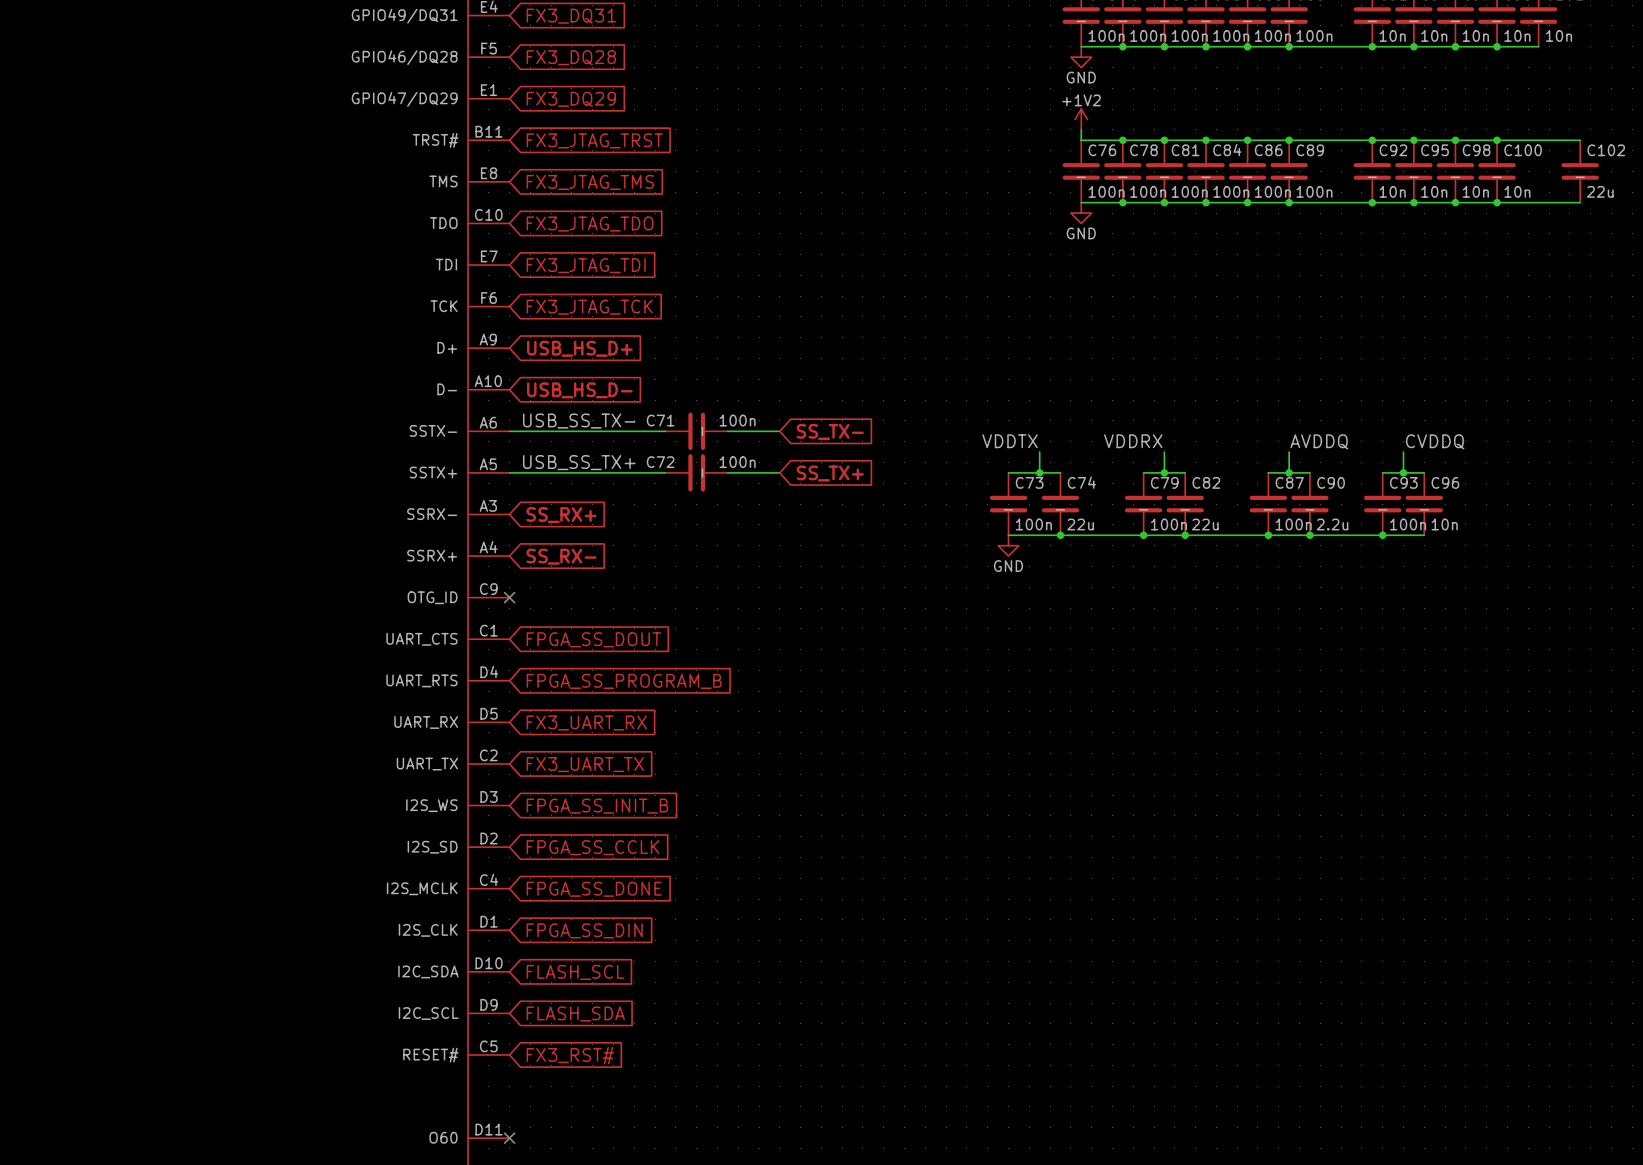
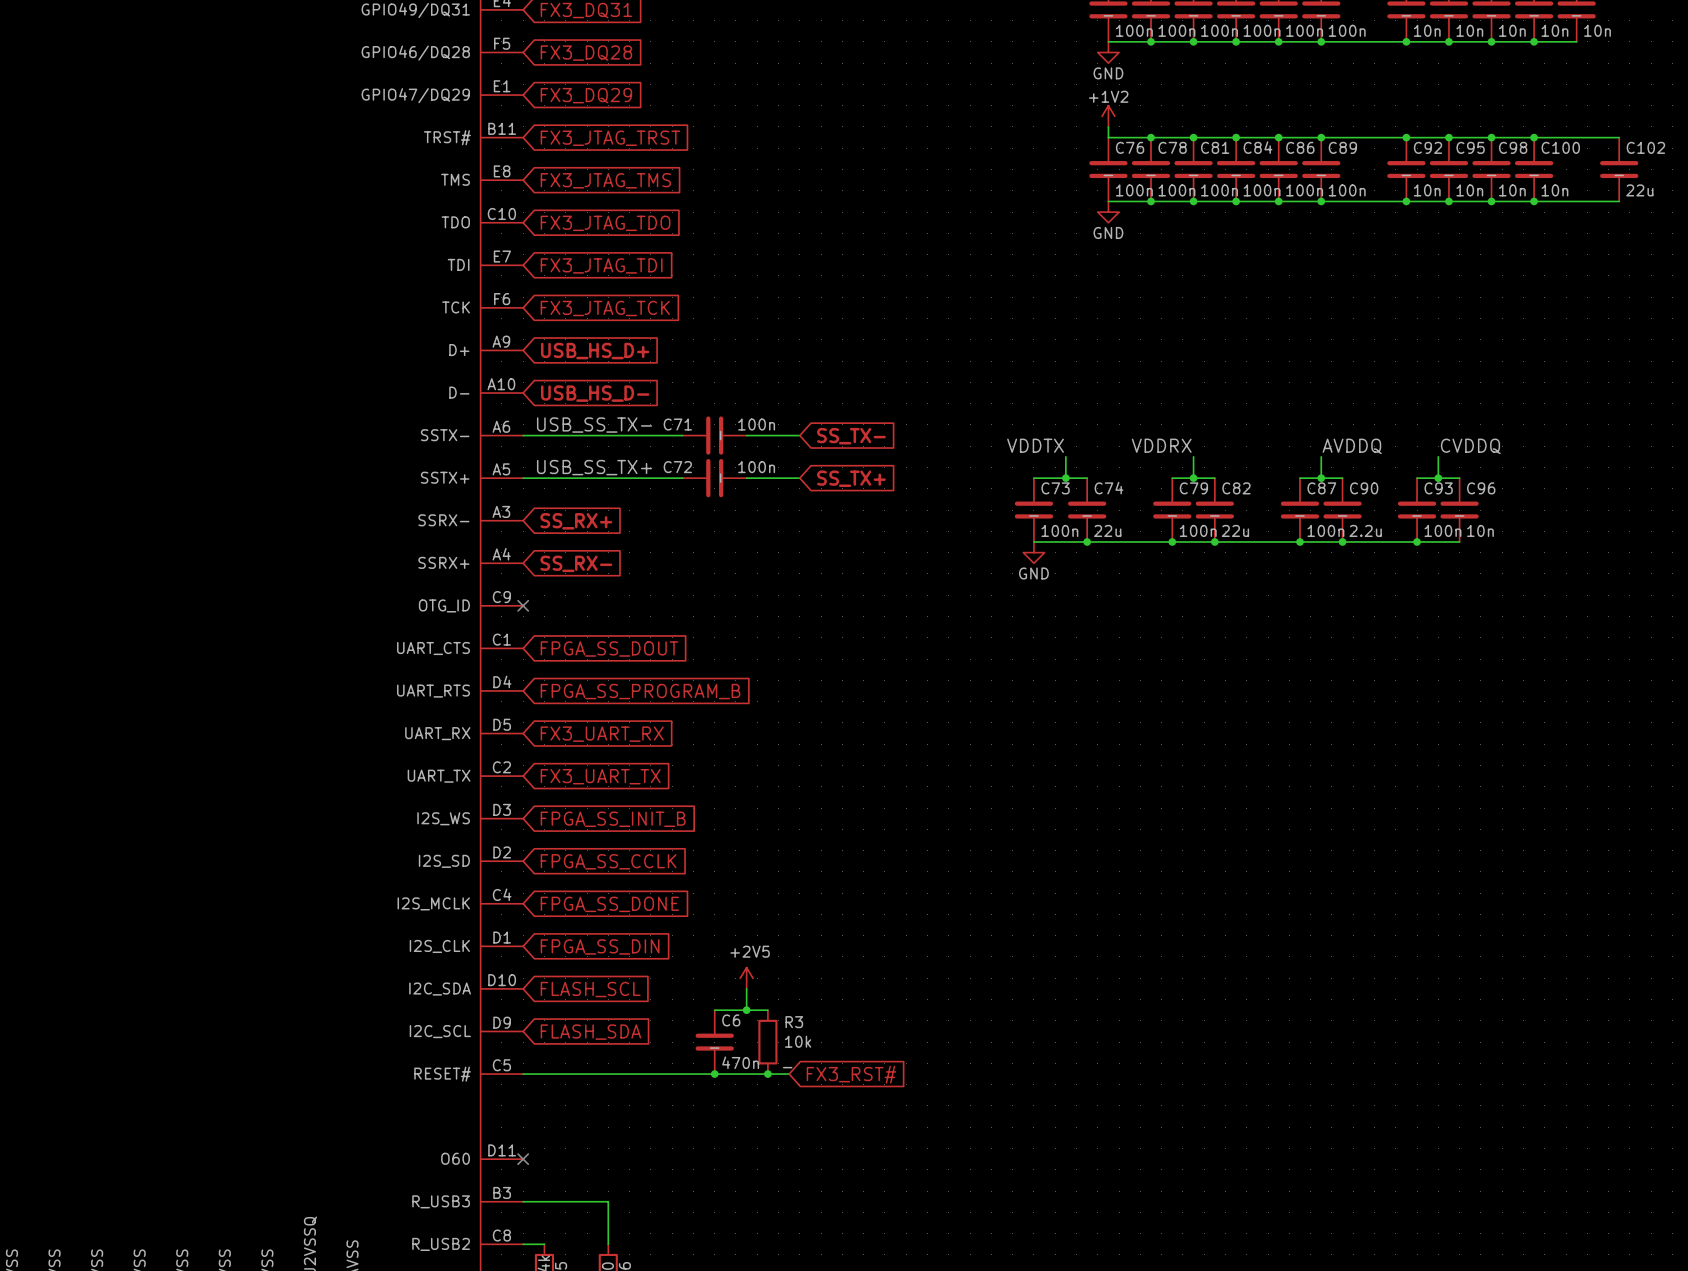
power symbol: none -> +2V5 (746, 978)
wire: none -> (746, 988) (746, 1010)
wire: none -> (714, 1010) (767, 1010)
junction: none -> (746, 1010)
C6: none -> 470n (714, 1042)
R3: none -> 10k (767, 1042)
wire: none -> (523, 1074) (789, 1074)
junction: none -> (714, 1074)
junction: none -> (767, 1074)
global label: FX3_RST# (570, 1055) -> none
global label: none -> FX3_RST# (851, 1074)

